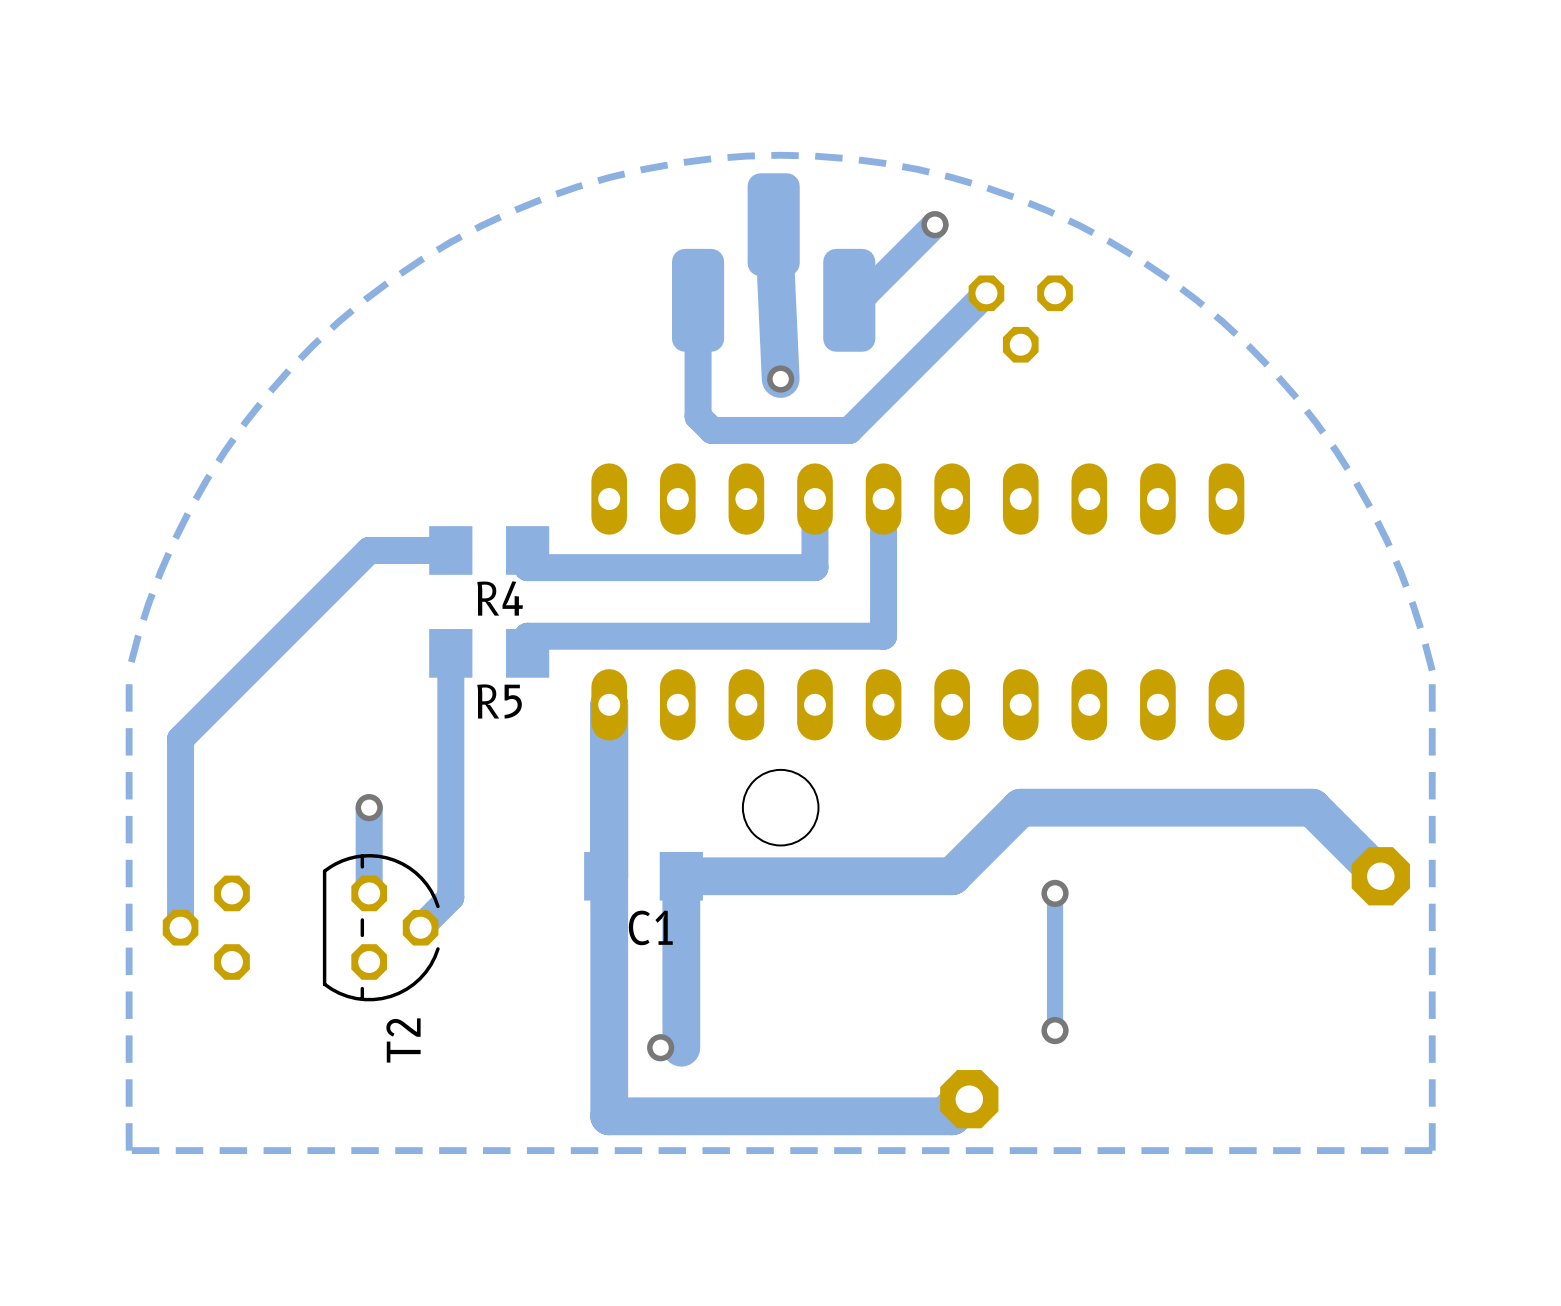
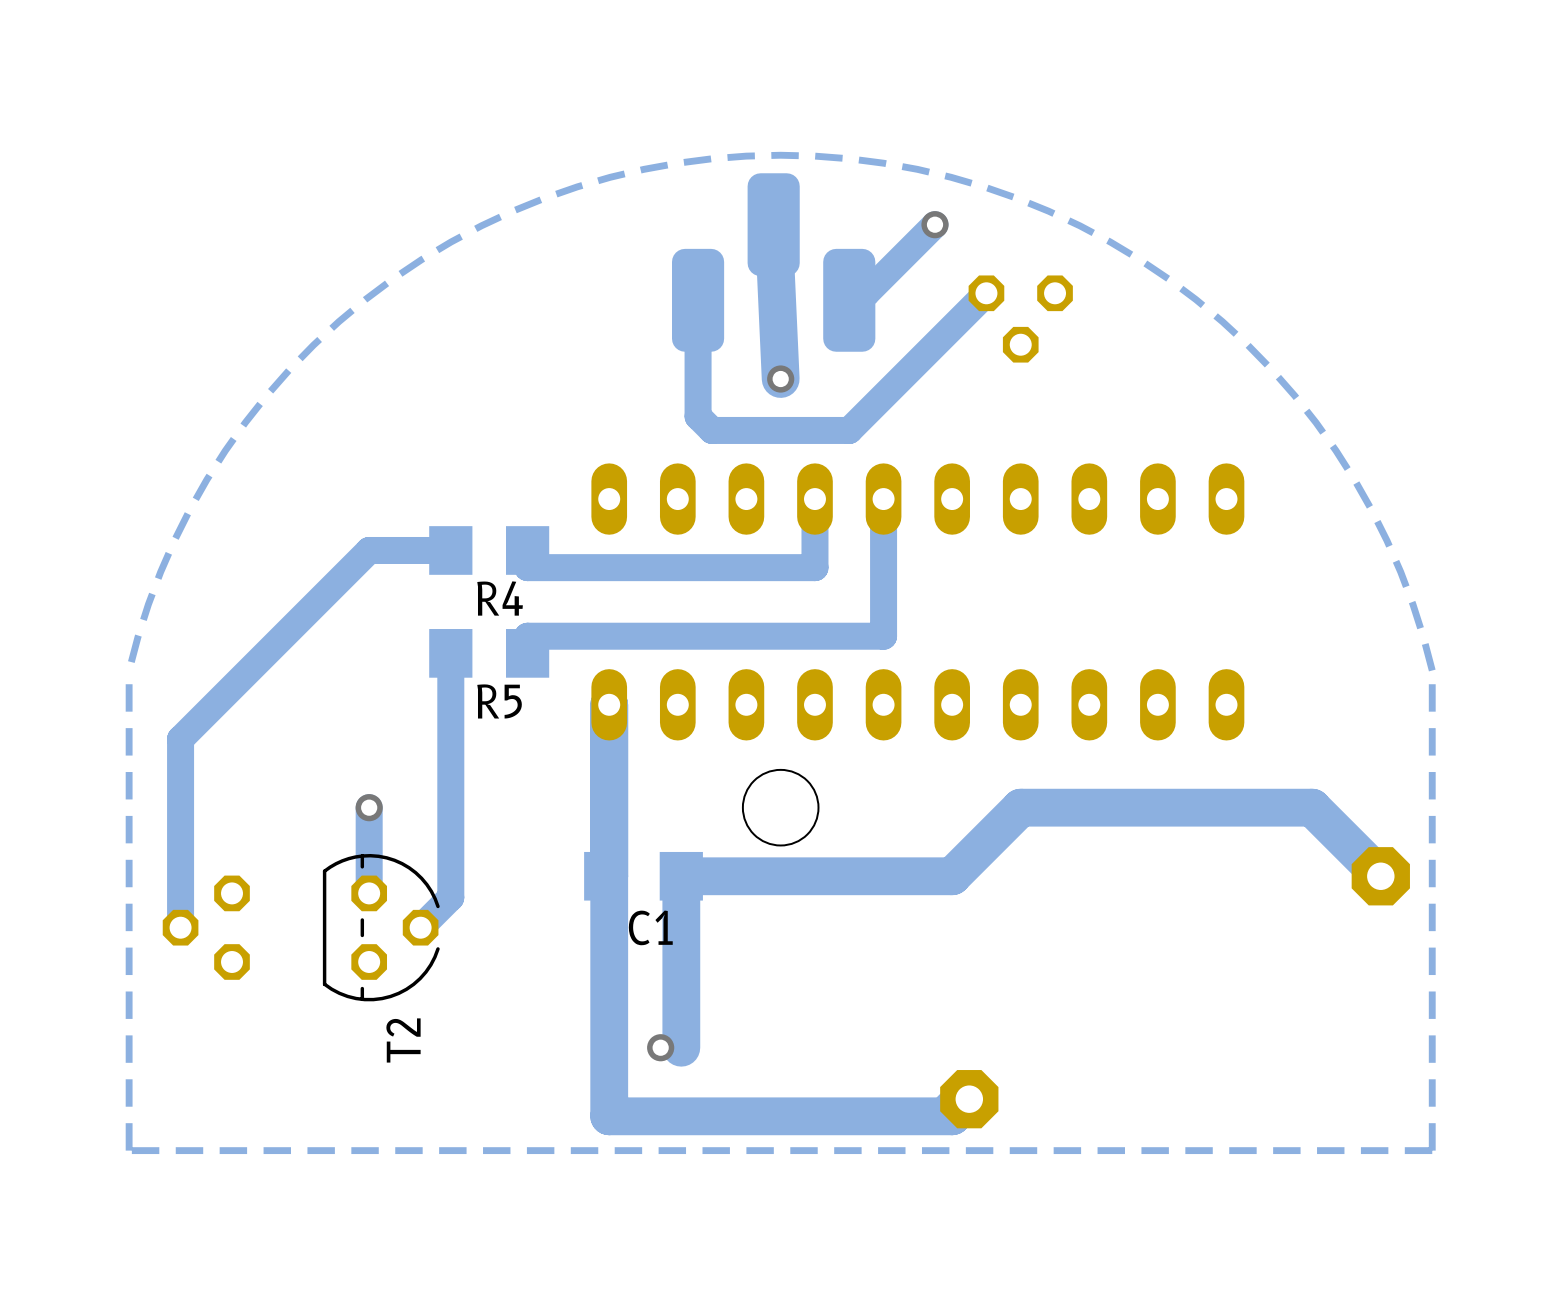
track: (1055, 893) (1055, 1030) -> none
via: (1055, 893) -> none
via: (1055, 1030) -> none

